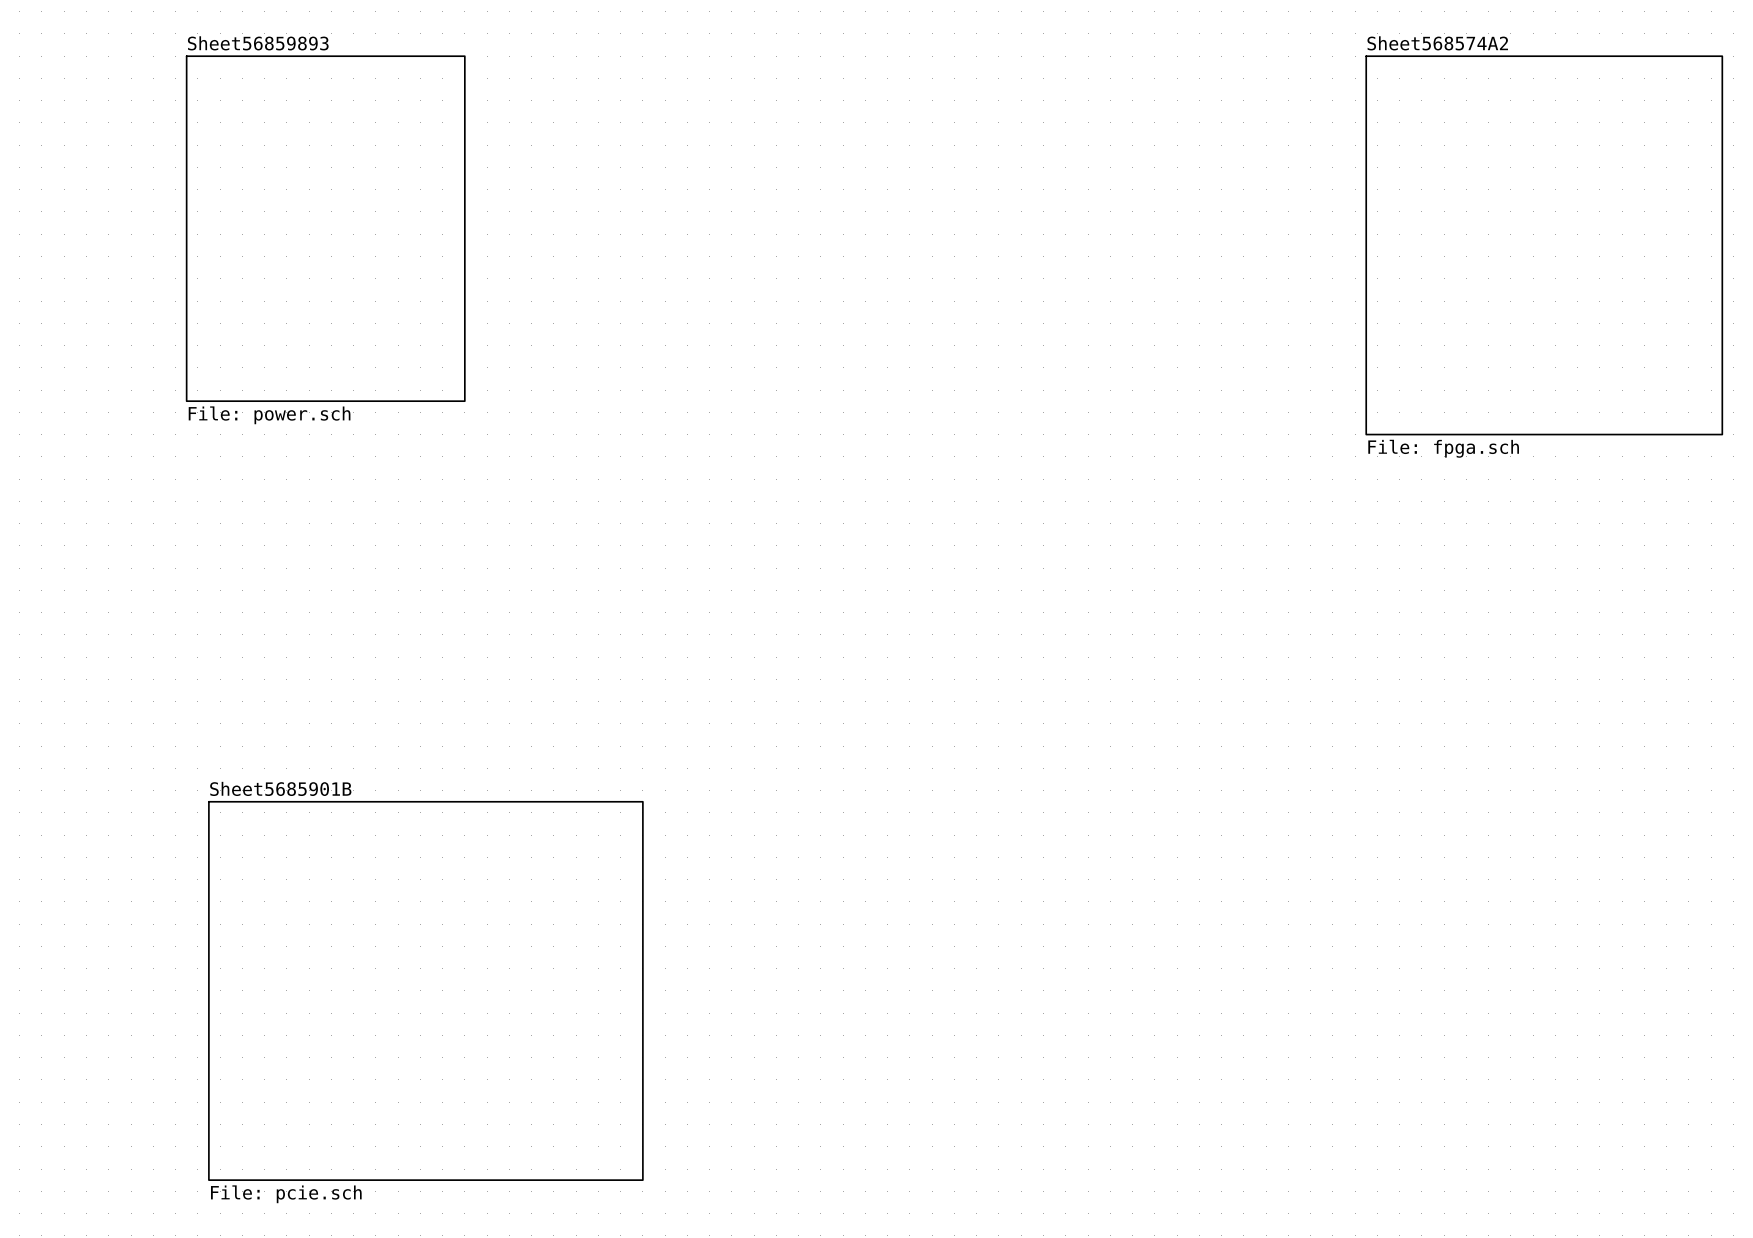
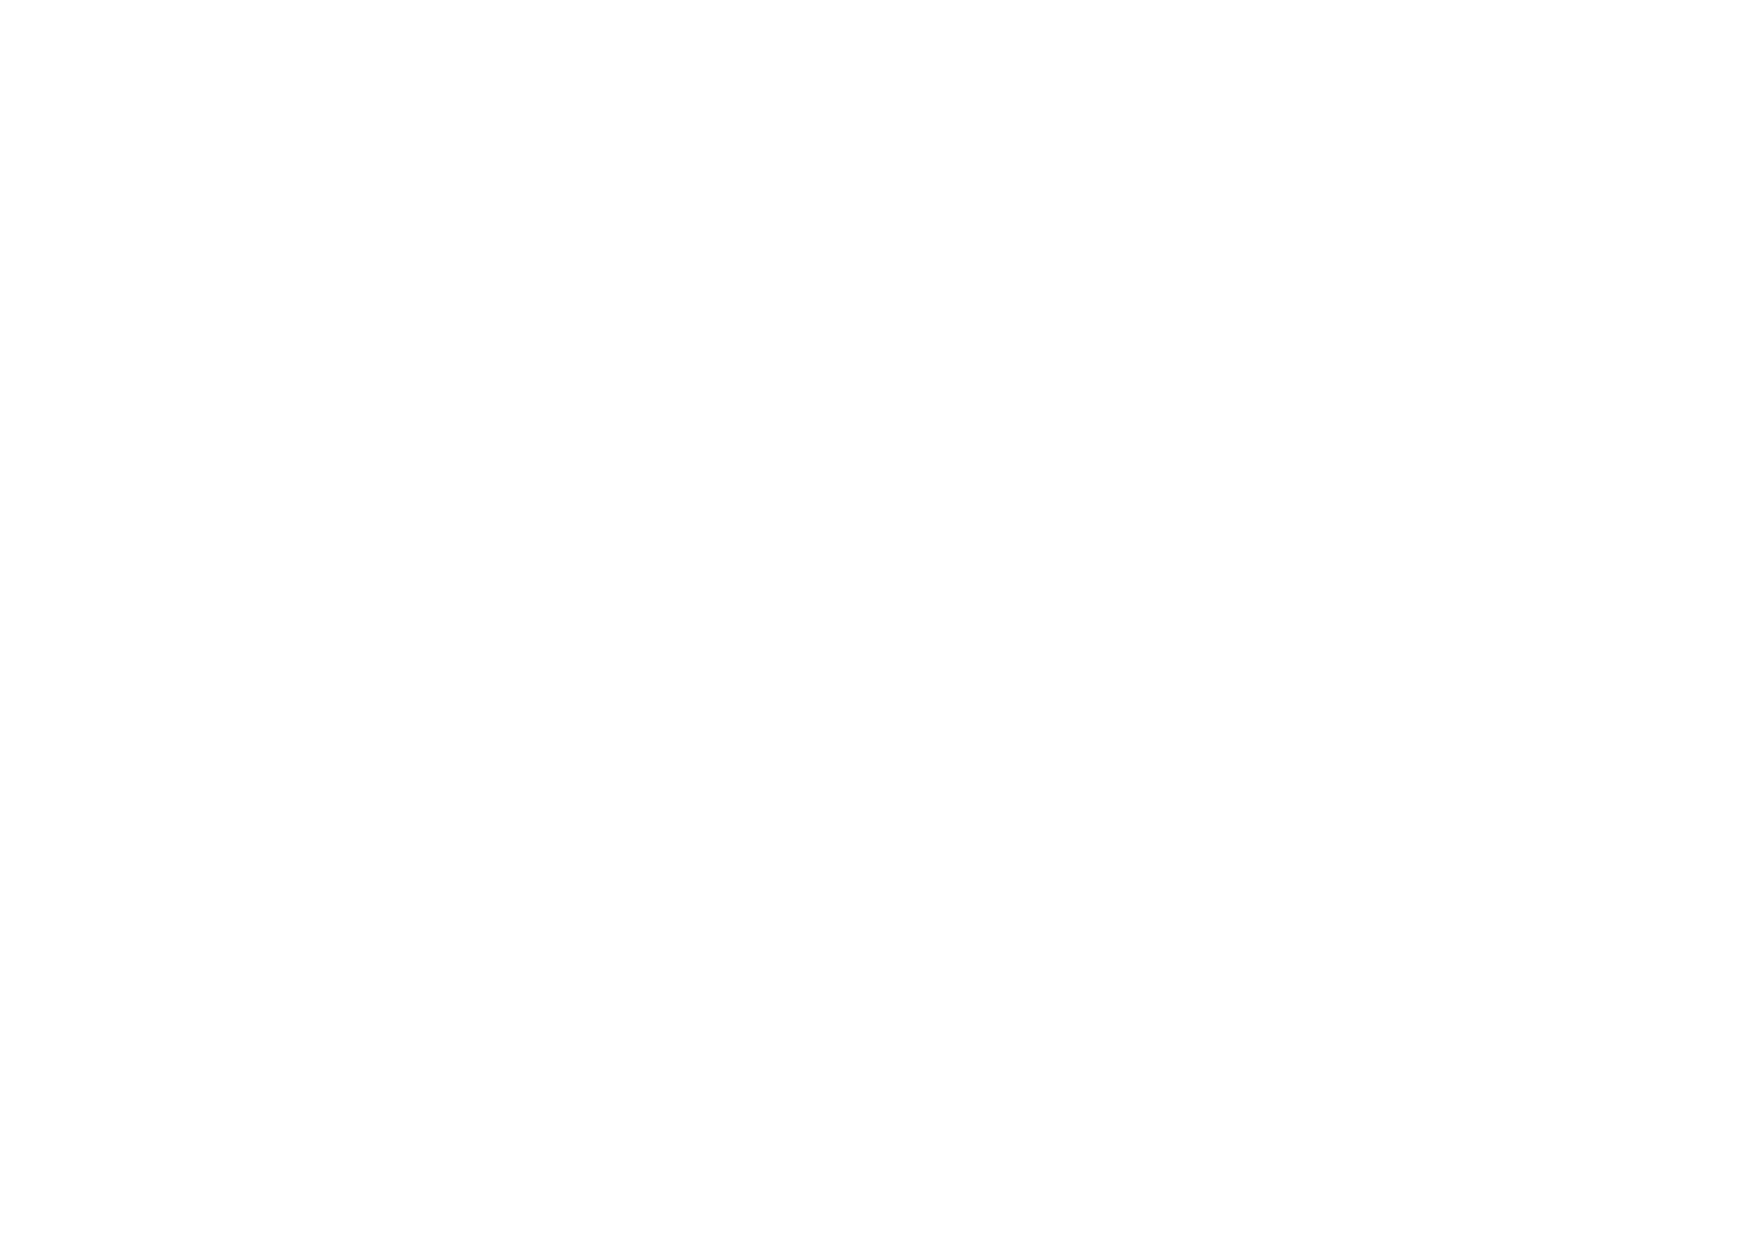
sheet Sheet56859893: File: power.sch (325, 228) -> none
sheet Sheet568574A2: File: fpga.sch (1544, 245) -> none
sheet Sheet5685901B: File: pcie.sch (425, 990) -> none

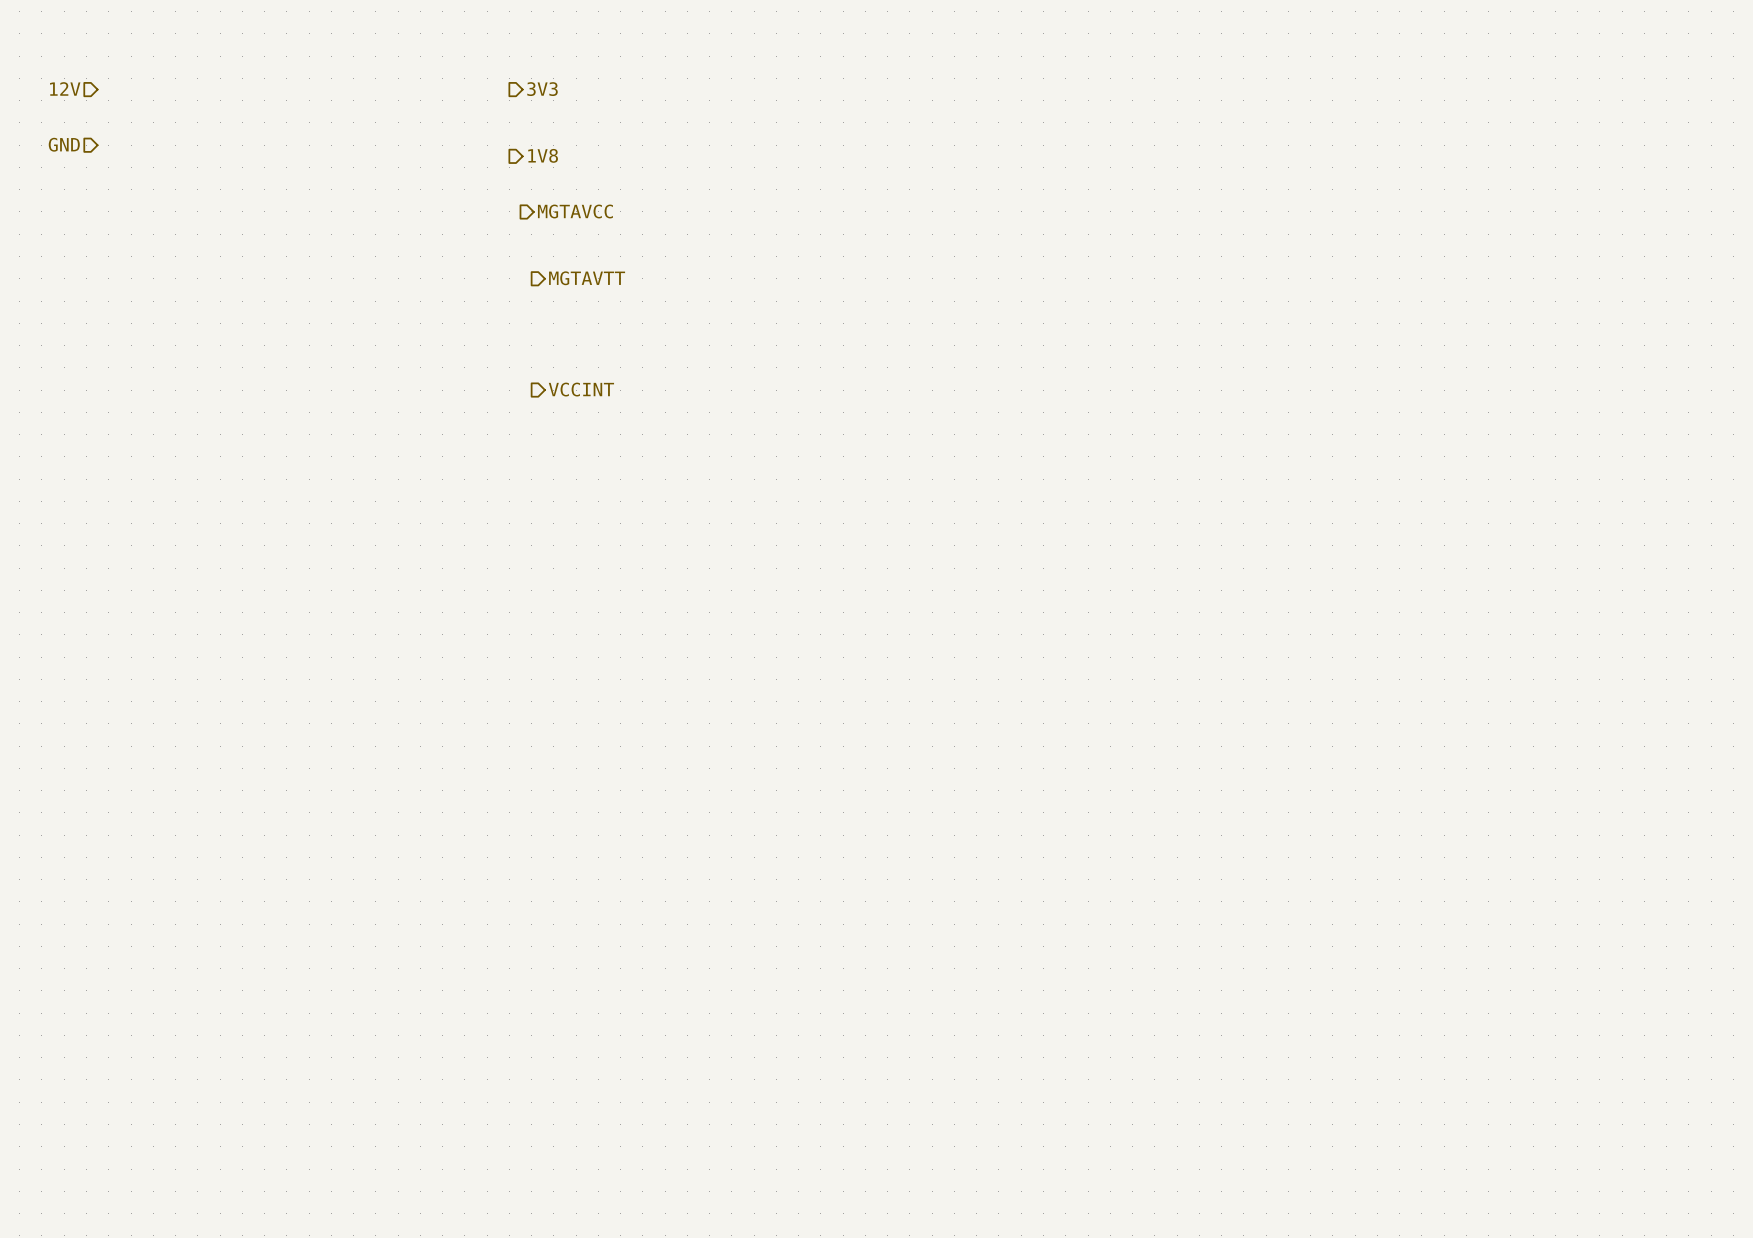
hierarchical label: none -> 12V (65, 88)
hierarchical label: none -> 3V3 (542, 89)
hierarchical label: none -> GND (64, 144)
hierarchical label: none -> 1V8 (543, 155)
hierarchical label: none -> MGTAVCC (575, 211)
hierarchical label: none -> MGTAVTT (587, 278)
hierarchical label: none -> VCCINT (581, 389)

